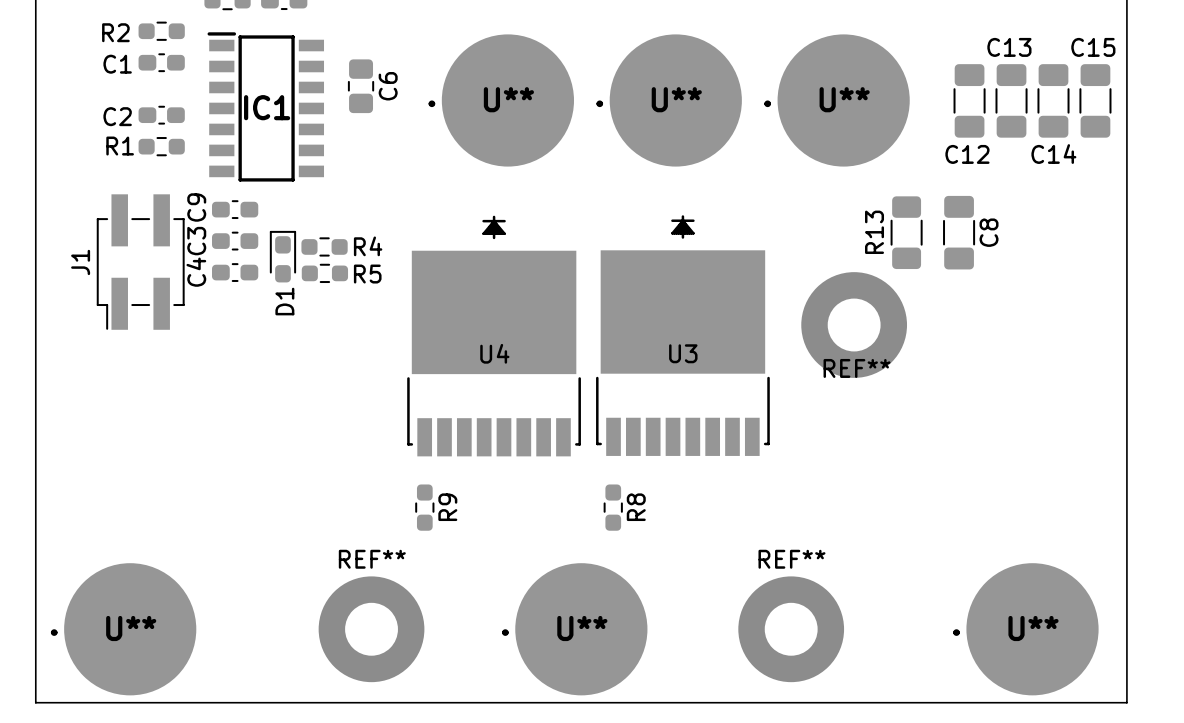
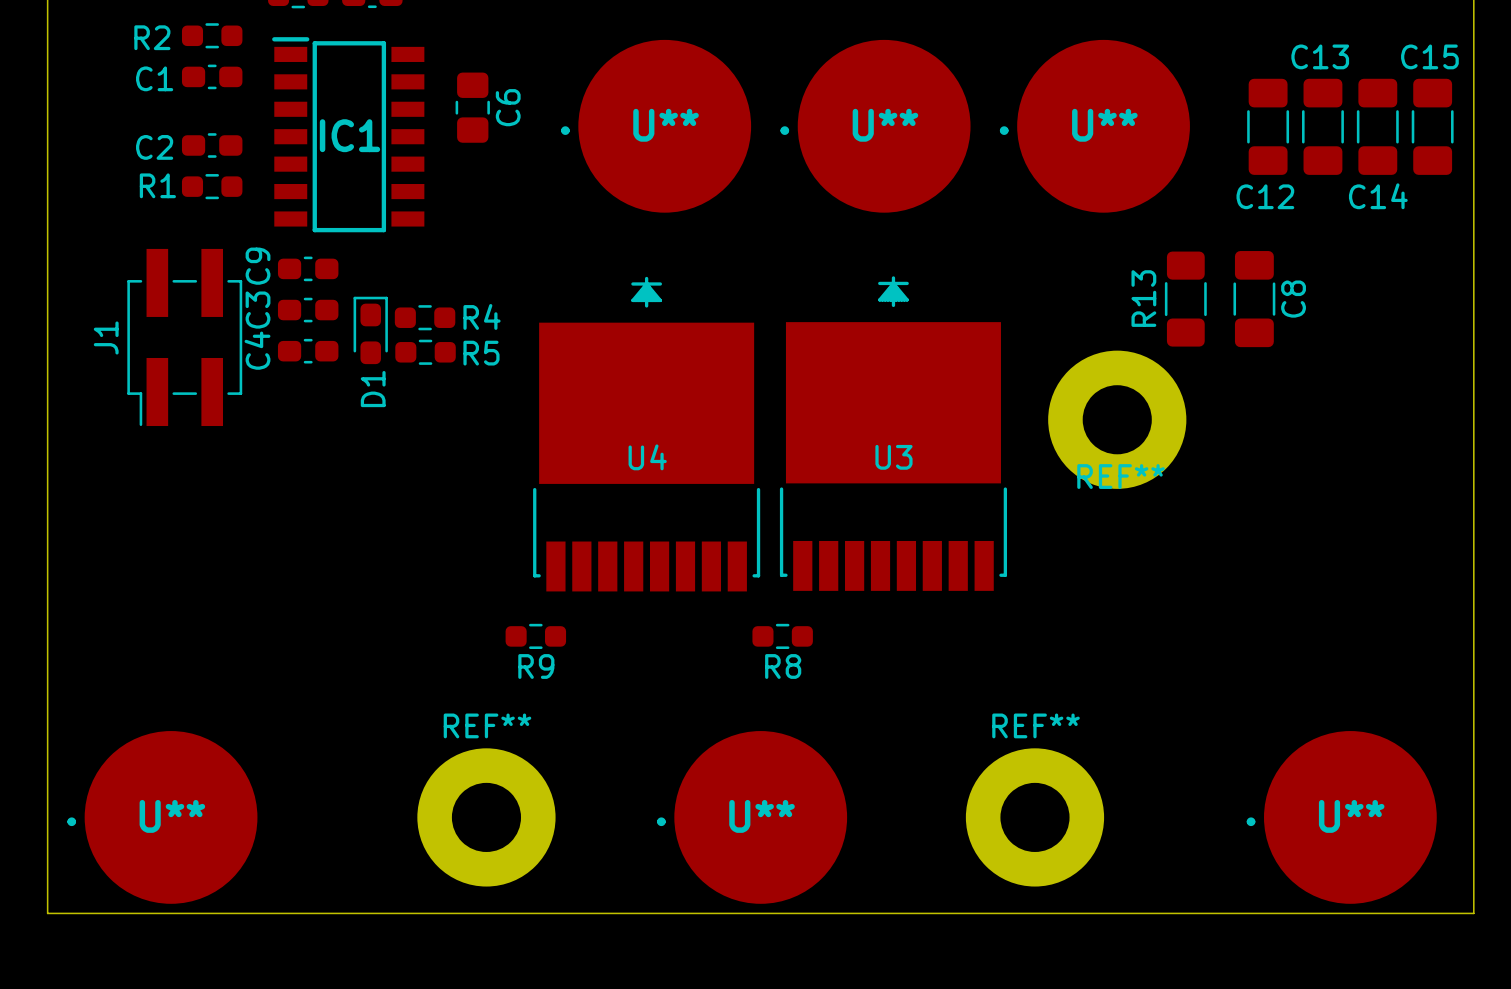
R9 rotation: 0° (424, 507) -> 90° clockwise (535, 636)
R8 rotation: 0° (613, 507) -> 90° clockwise (782, 636)

